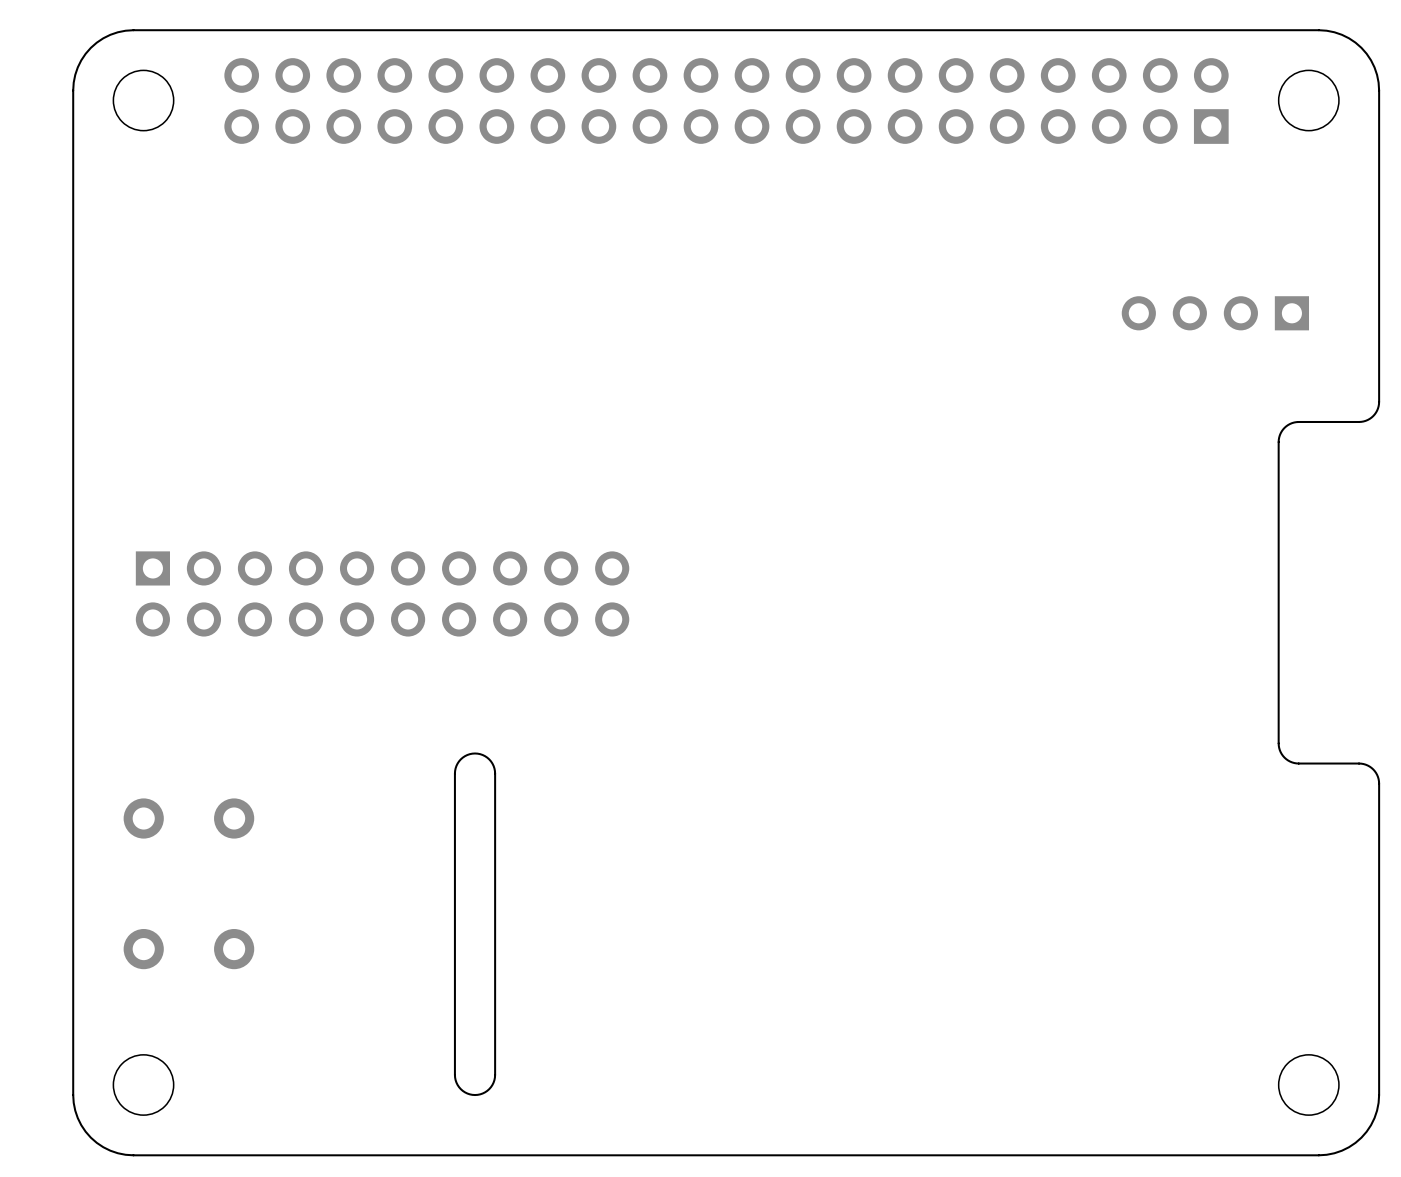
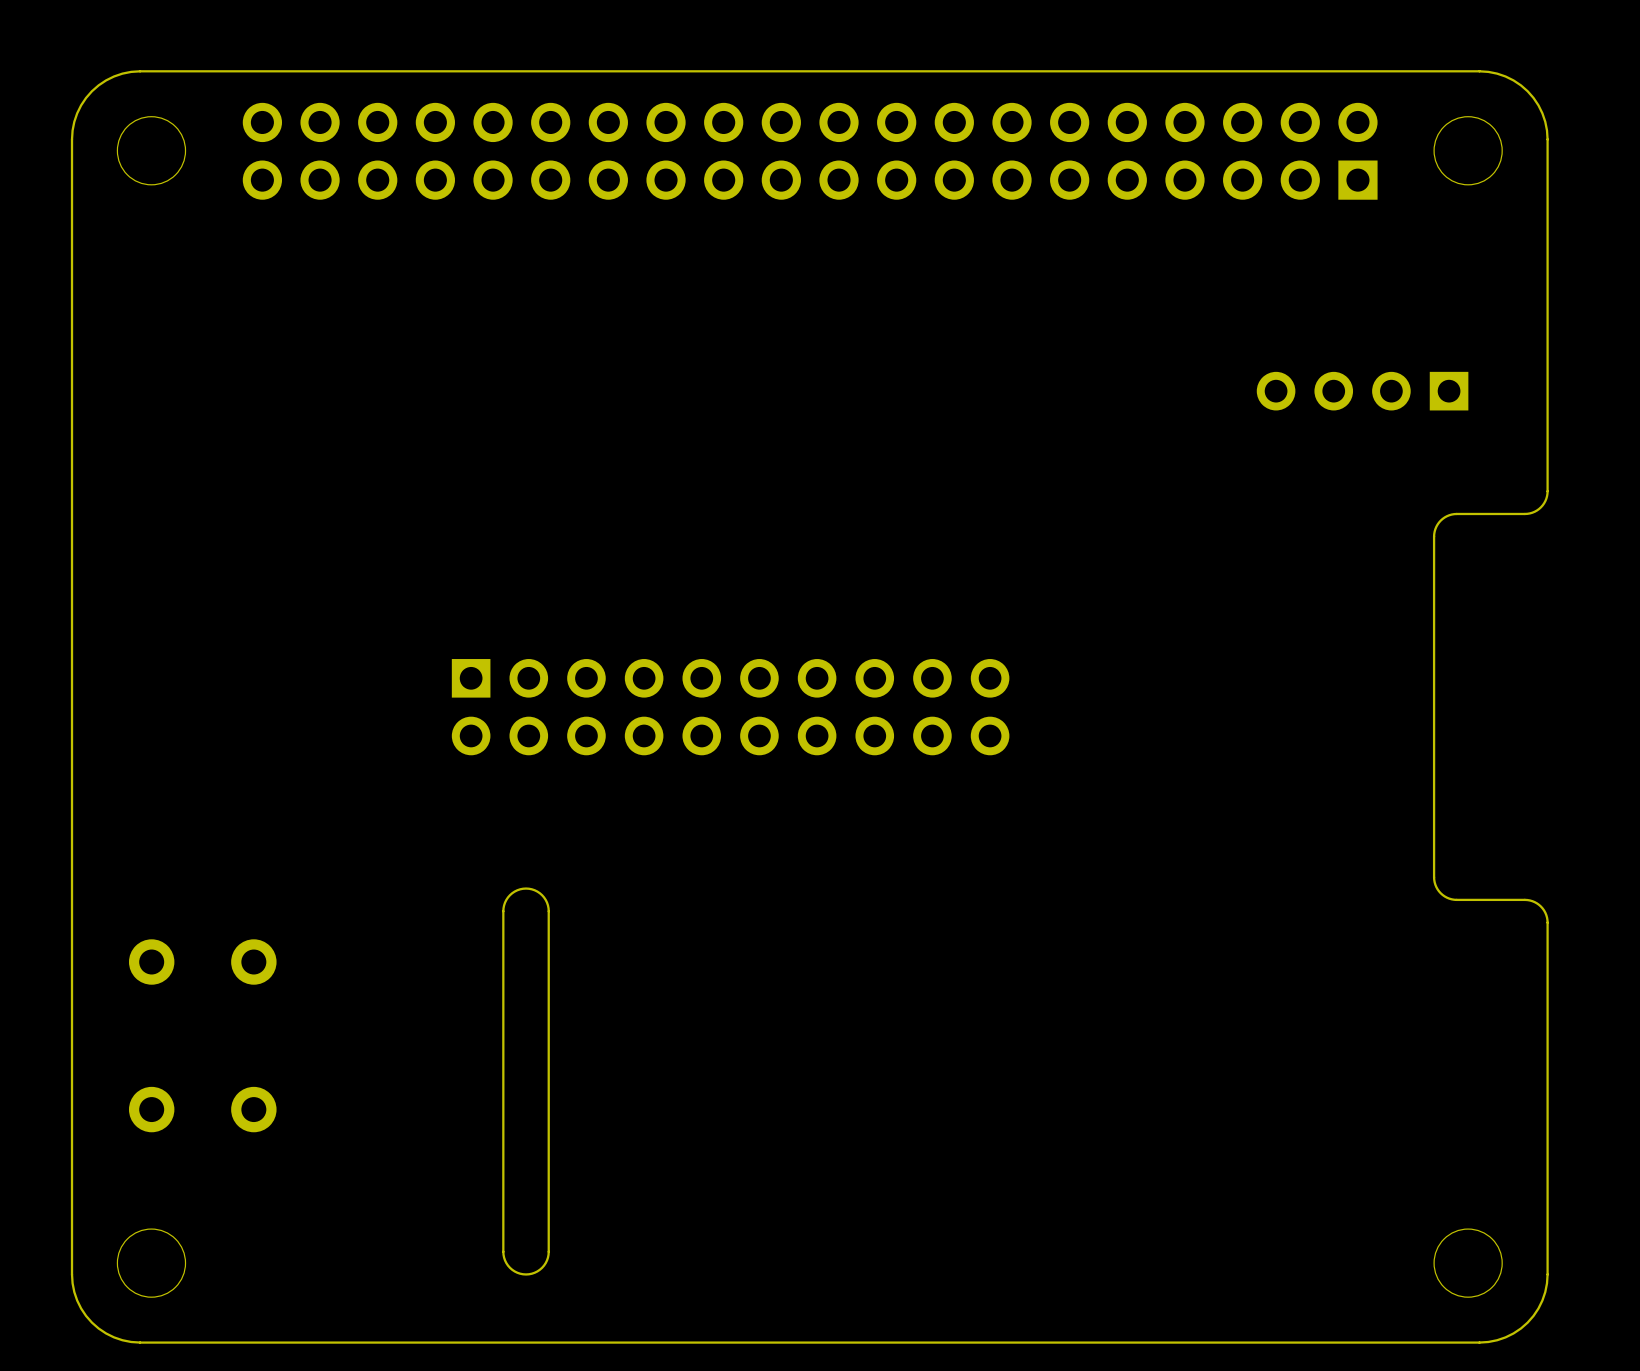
part position: (382, 593) -> (730, 707)

